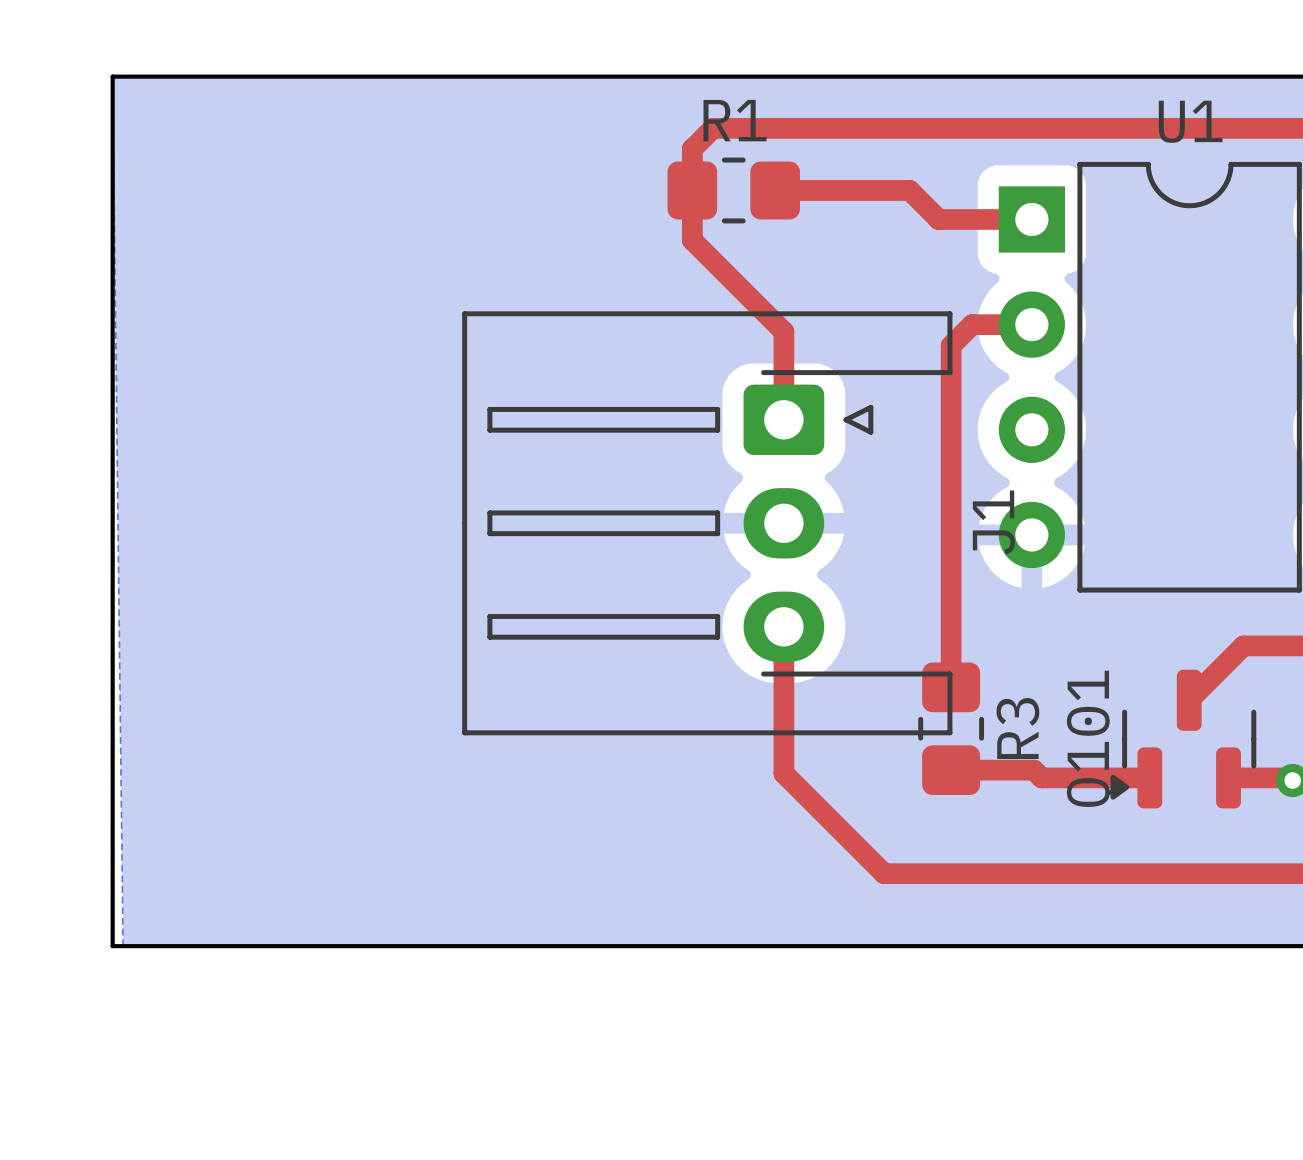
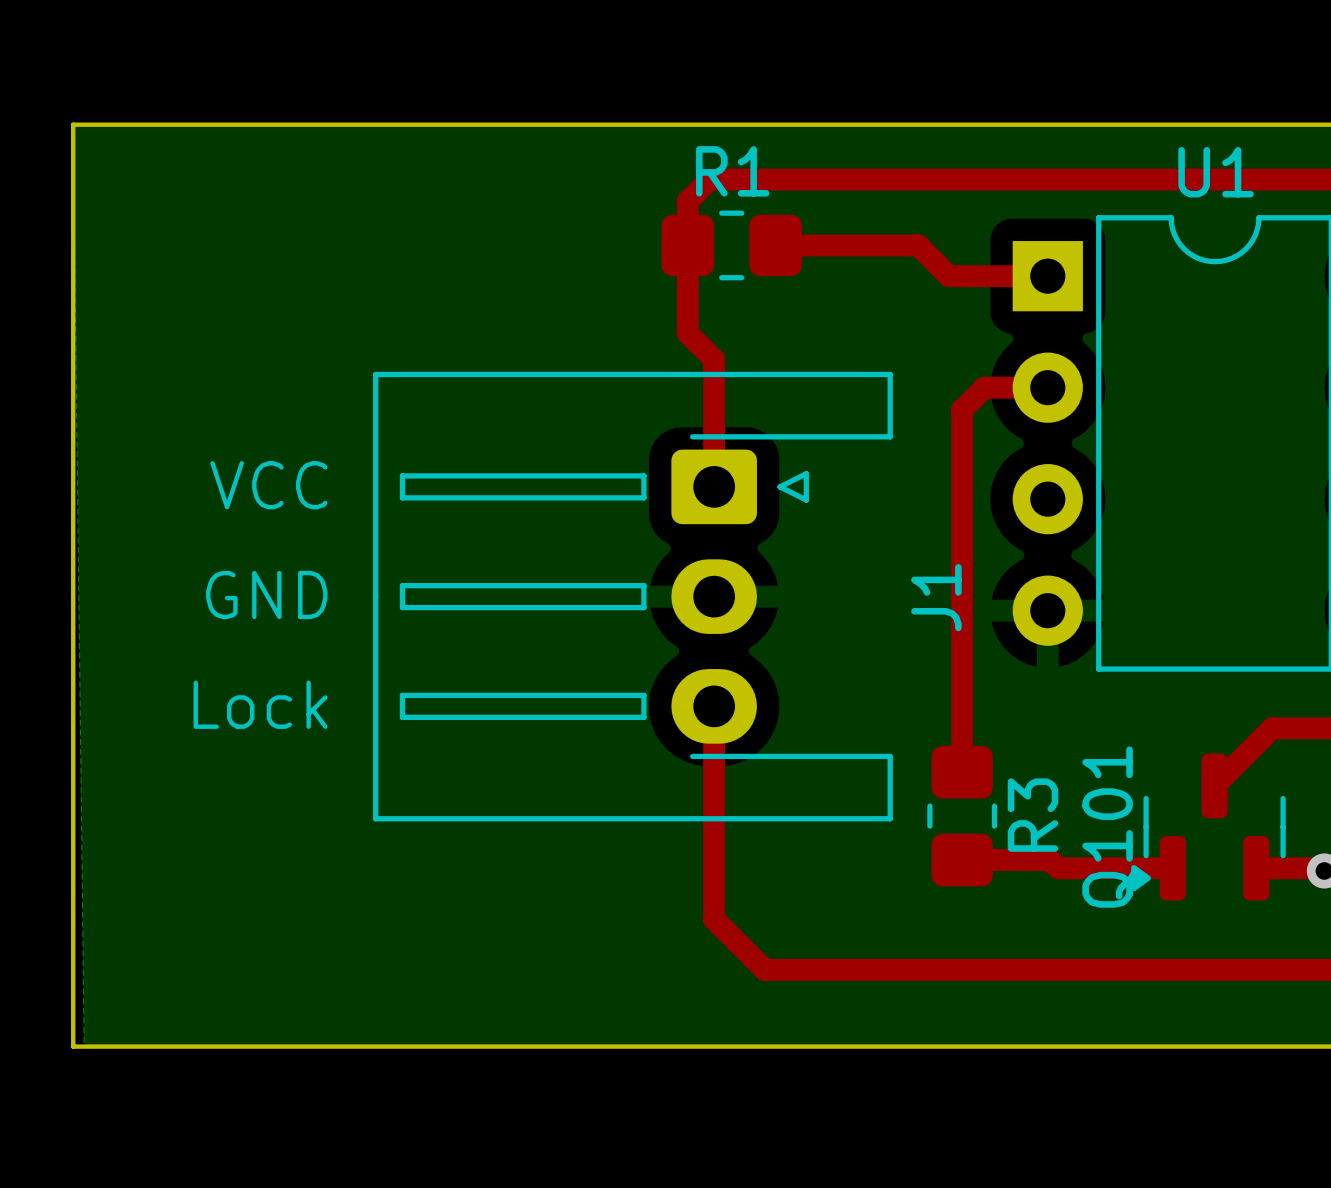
top track: (692, 240) (783, 331) (783, 419) -> (687, 298) (687, 333) (714, 359) (714, 486)
text: none -> VCC (268, 485)
text: none -> GND (266, 594)
J1 position: (707, 523) -> (632, 596)
text: none -> Lock (260, 704)
top track: (783, 626) (783, 773) (884, 873) -> (714, 706) (714, 919) (764, 969) (891, 969)

